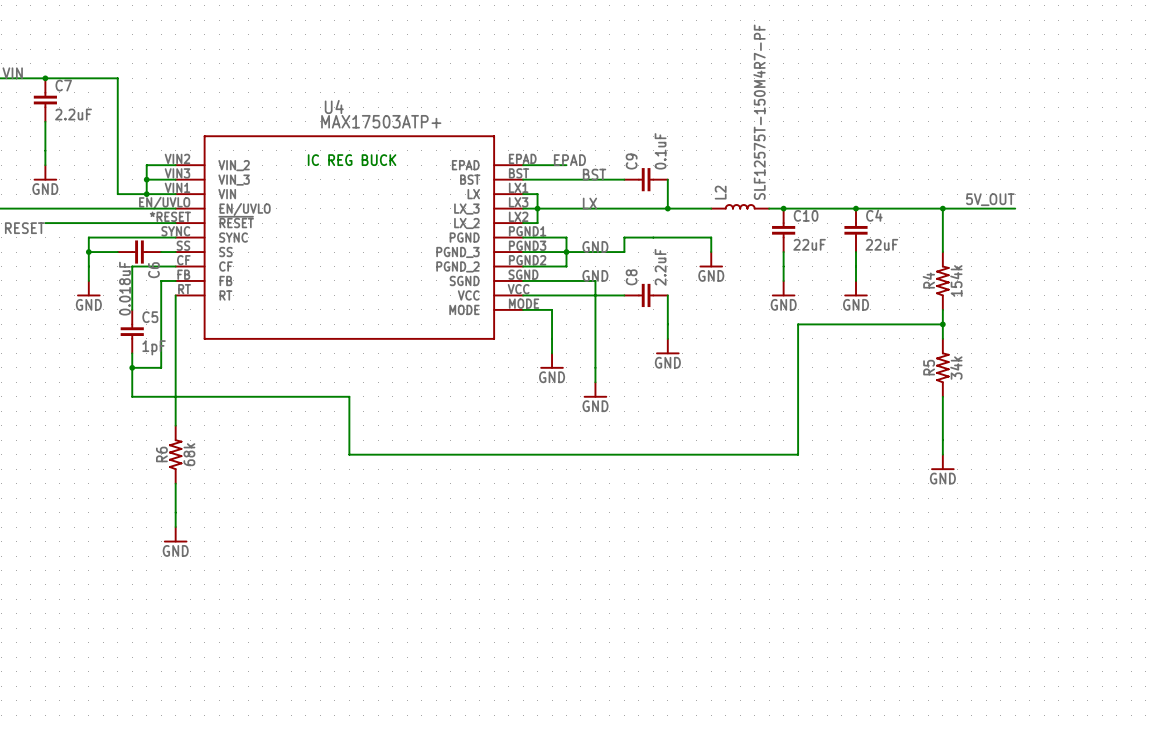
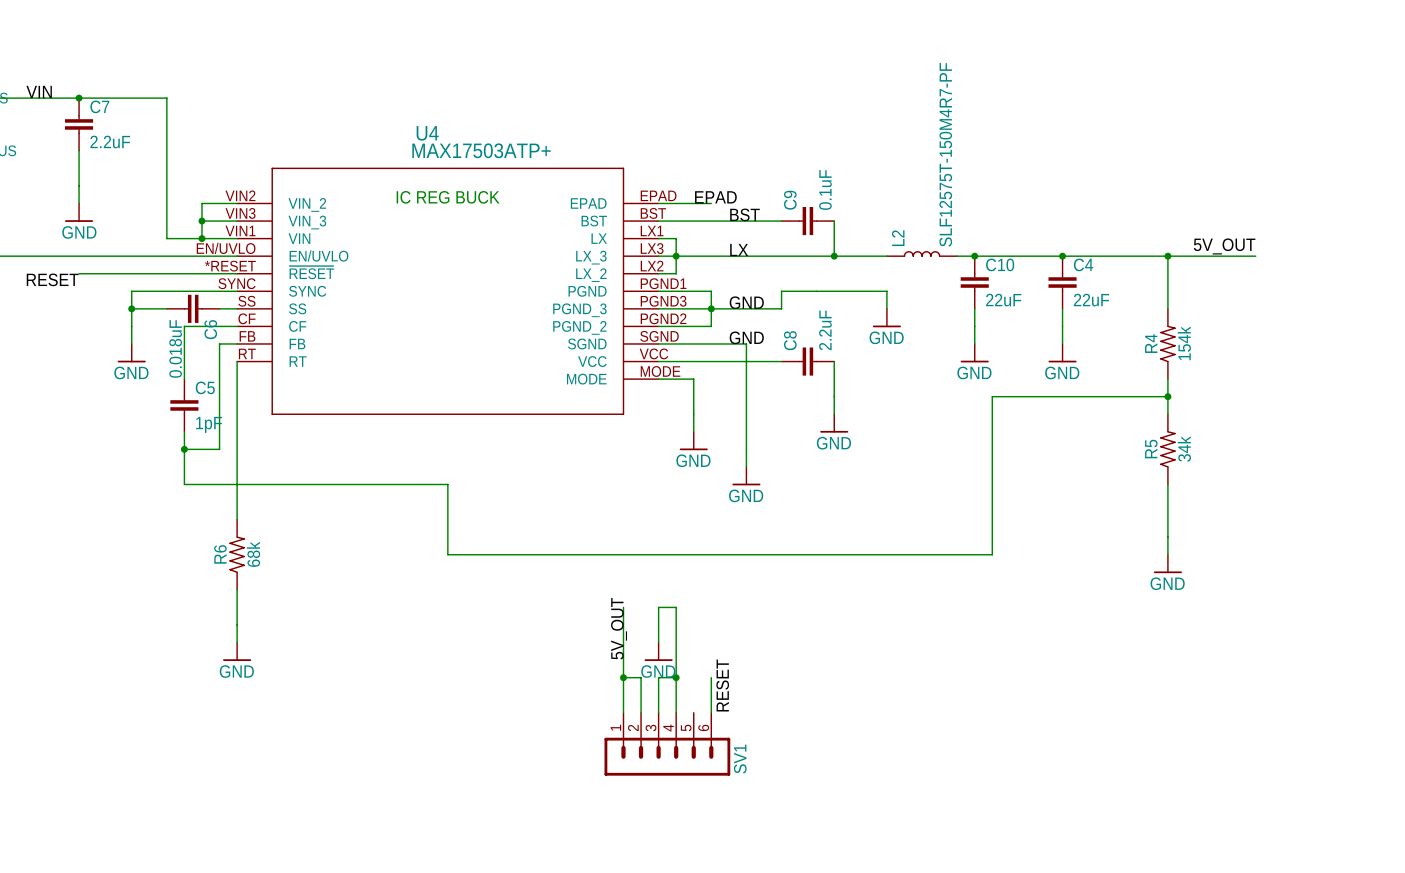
wire: none -> (623, 607) (623, 712)
label: none -> 5V_OUT (619, 628)
wire: none -> (658, 642) (658, 607) (676, 607) (676, 712)
power symbol: none -> GND (658, 651)
wire: none -> (623, 677) (641, 677) (641, 712)
junction: none -> (623, 677)
wire: none -> (676, 677) (658, 677) (658, 712)
junction: none -> (676, 677)
wire: none -> (711, 677) (711, 712)
label: none -> RESET (722, 685)
SV1: none -> (667, 744)

